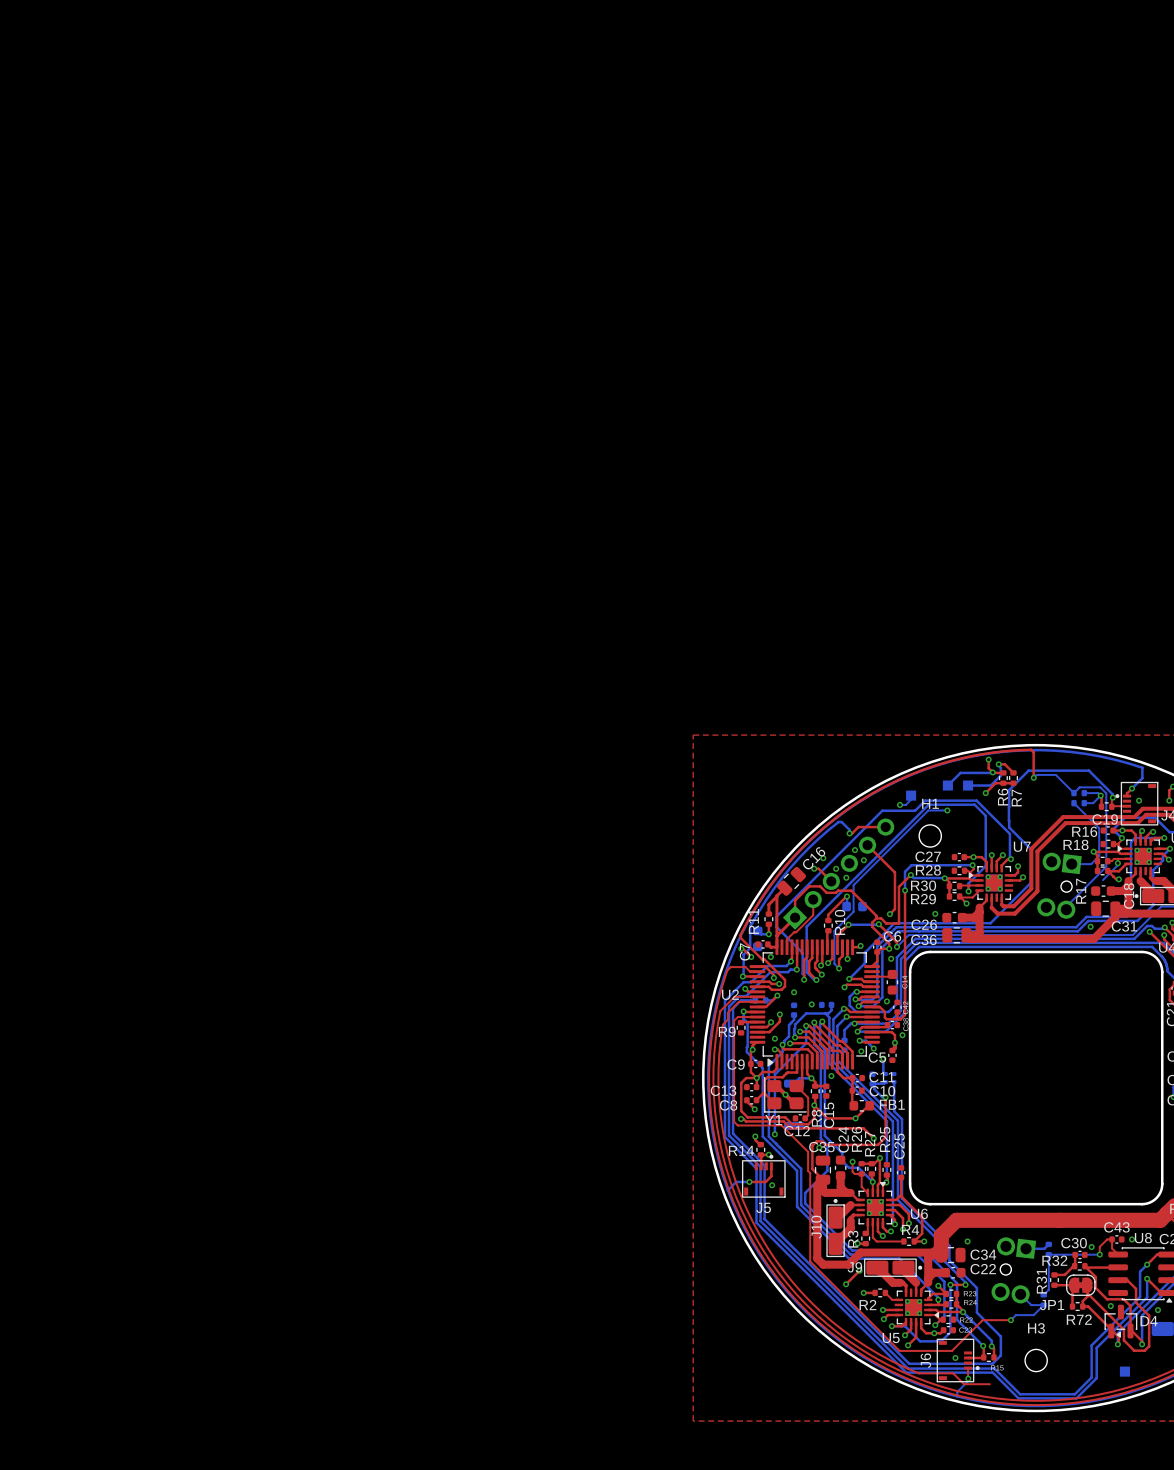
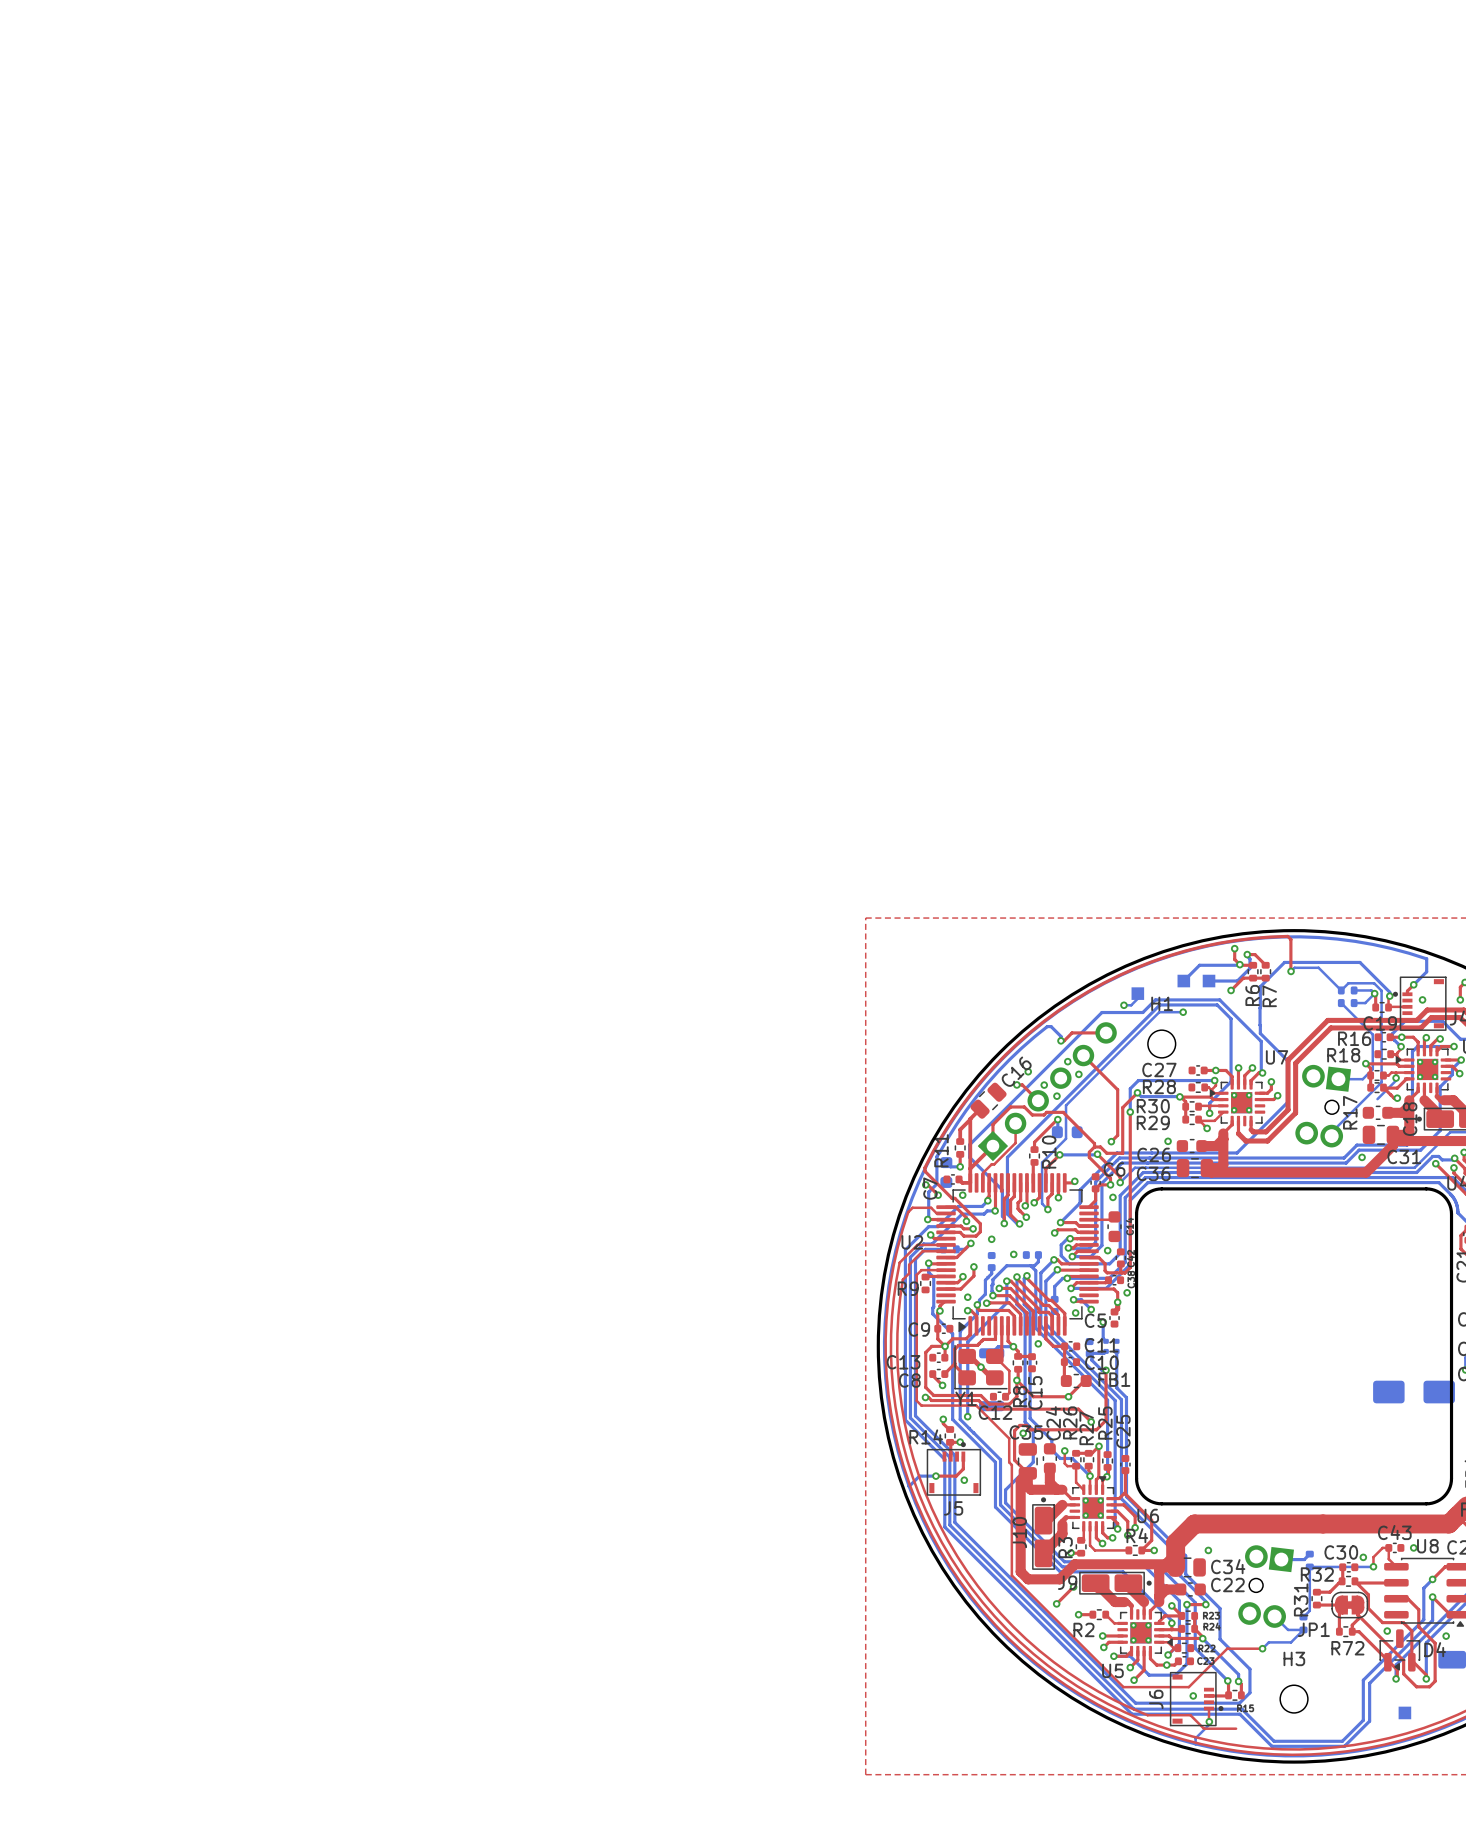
part: none -> (1414, 1392)

